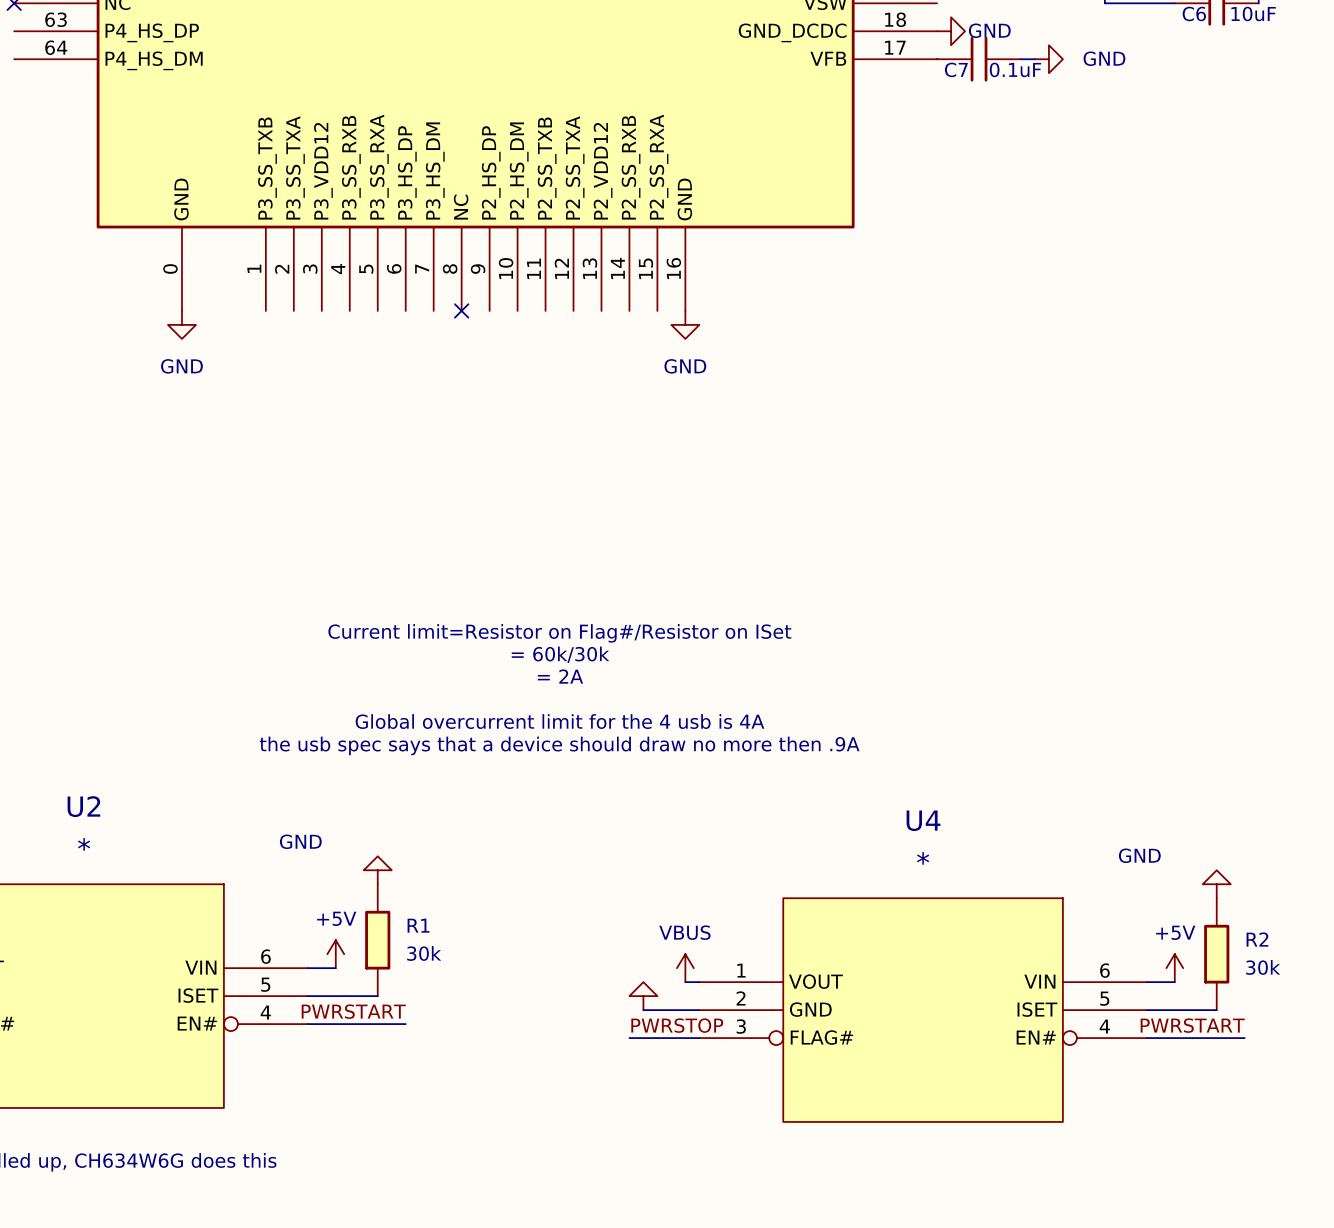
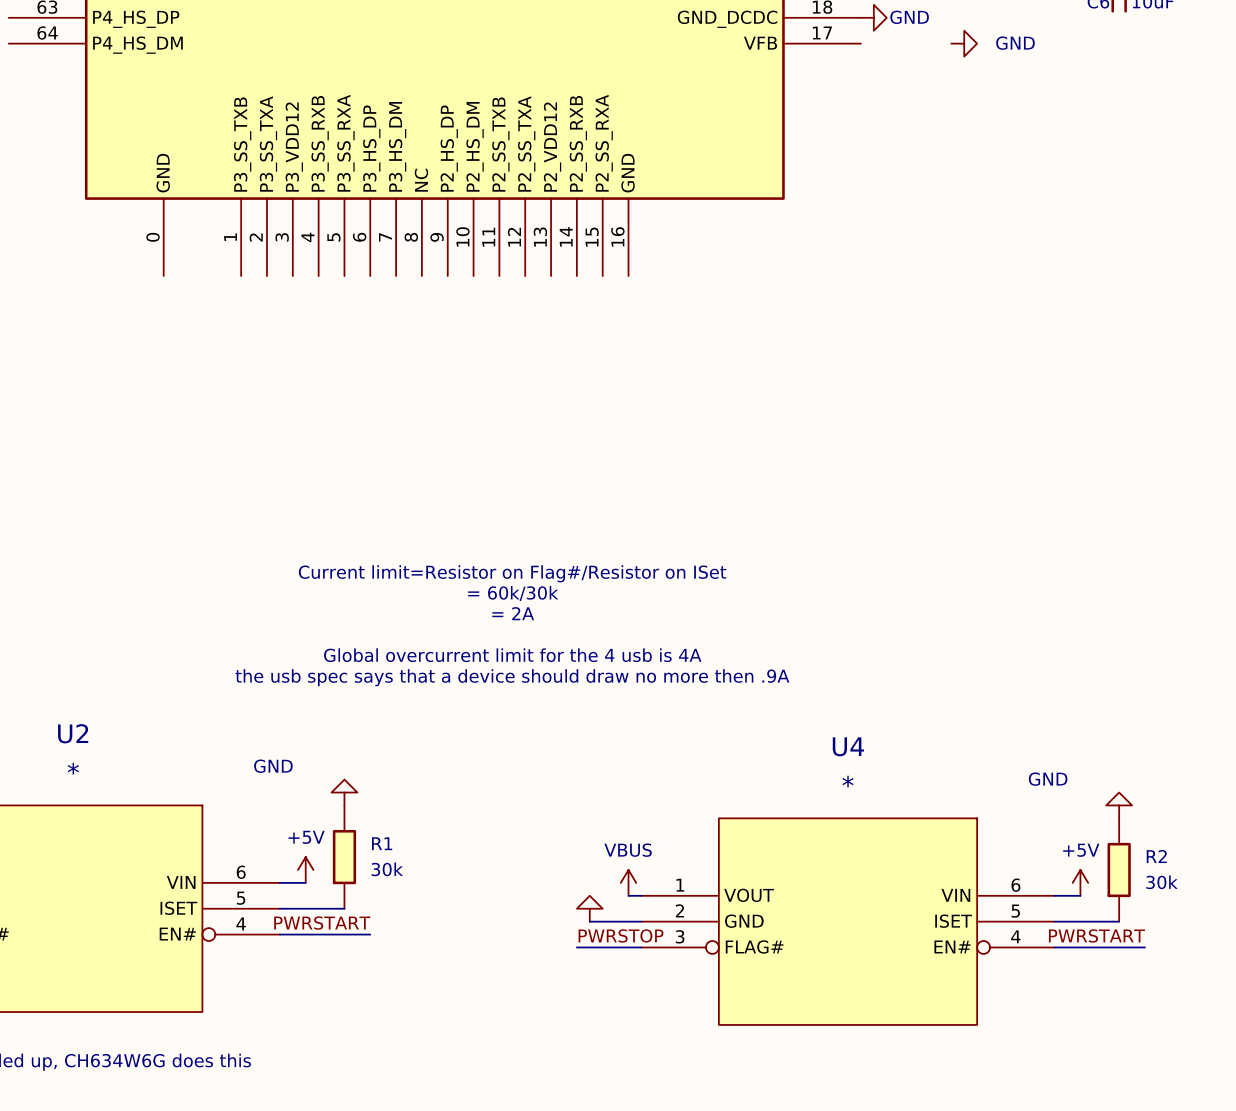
C7: 0.1uF (979, 59) -> none
wire: (1020, 59) (1034, 59) -> none
no-connect mark: (461, 310) -> none
power symbol: GND (181, 324) -> none
power symbol: GND (685, 324) -> none

